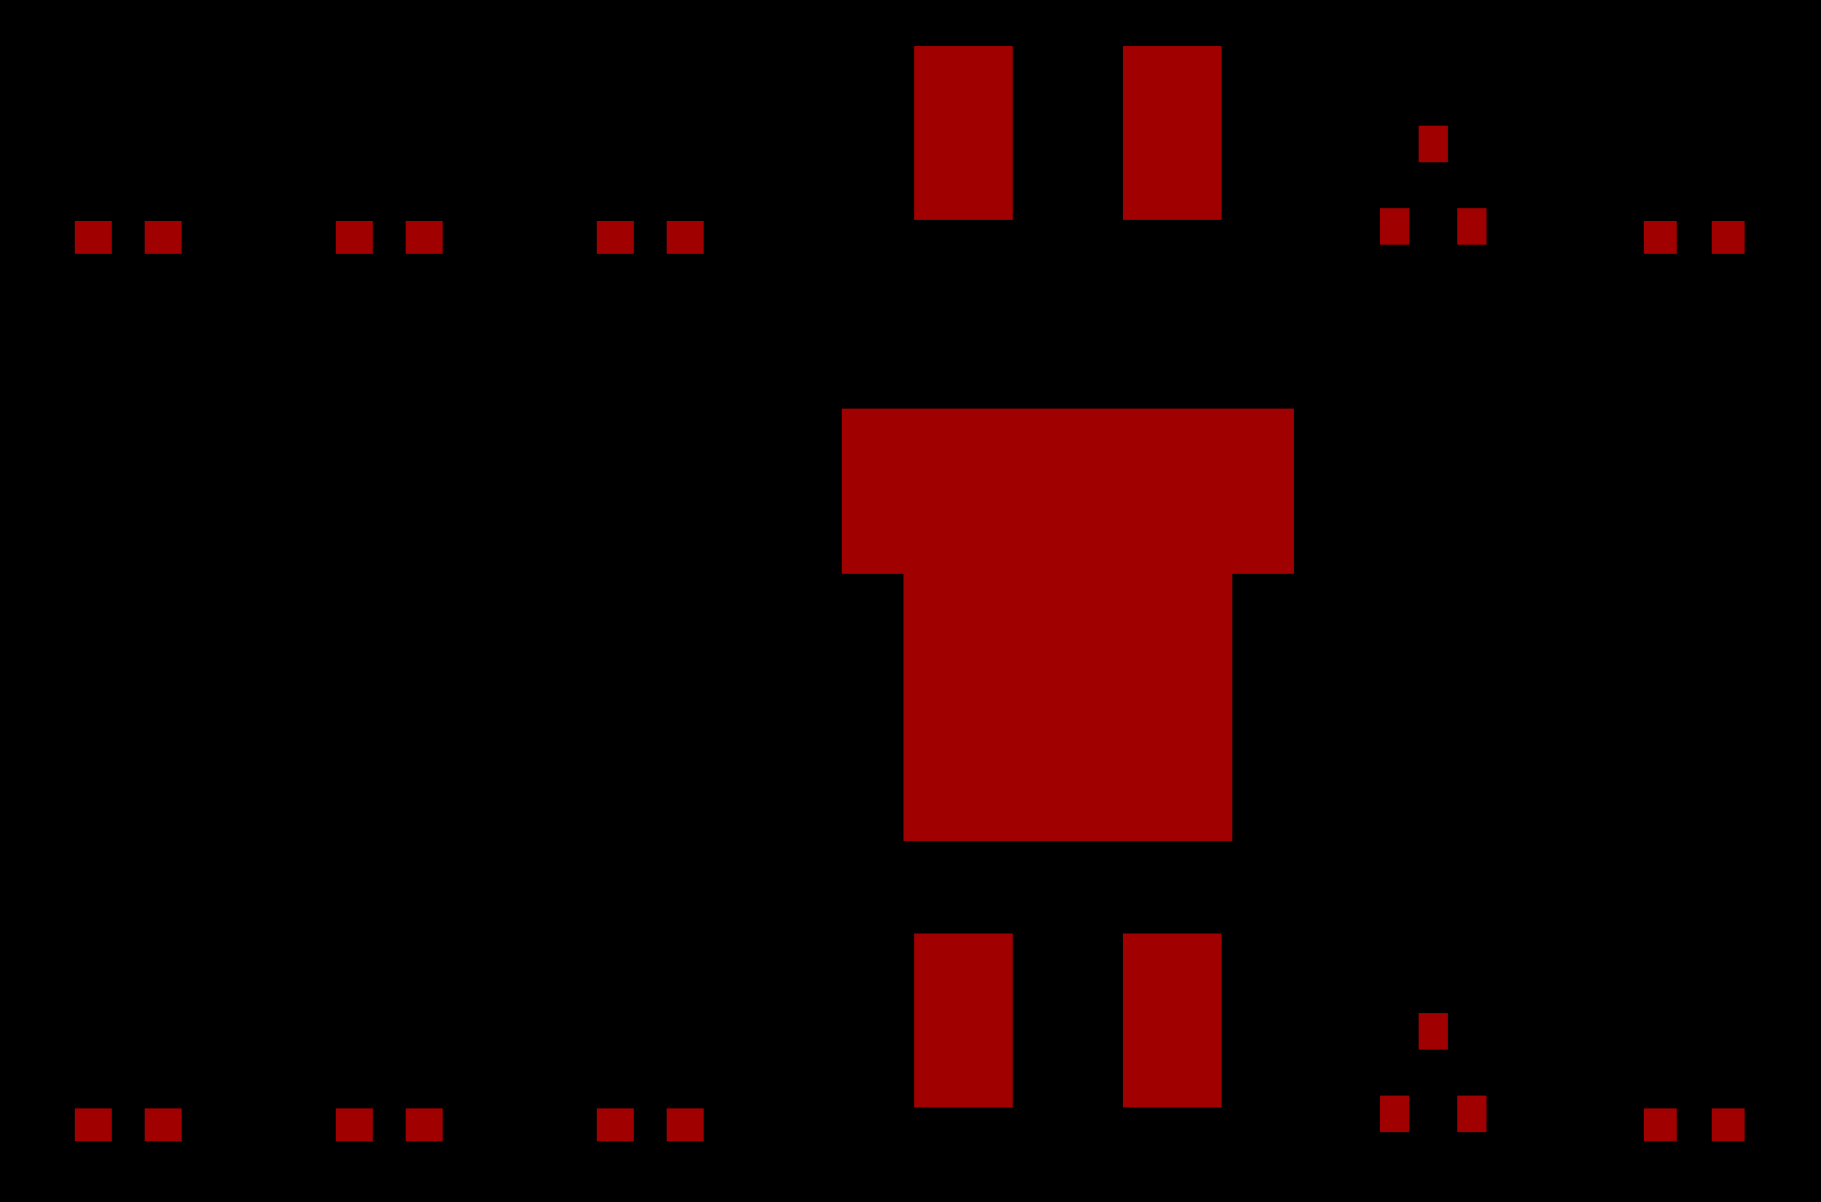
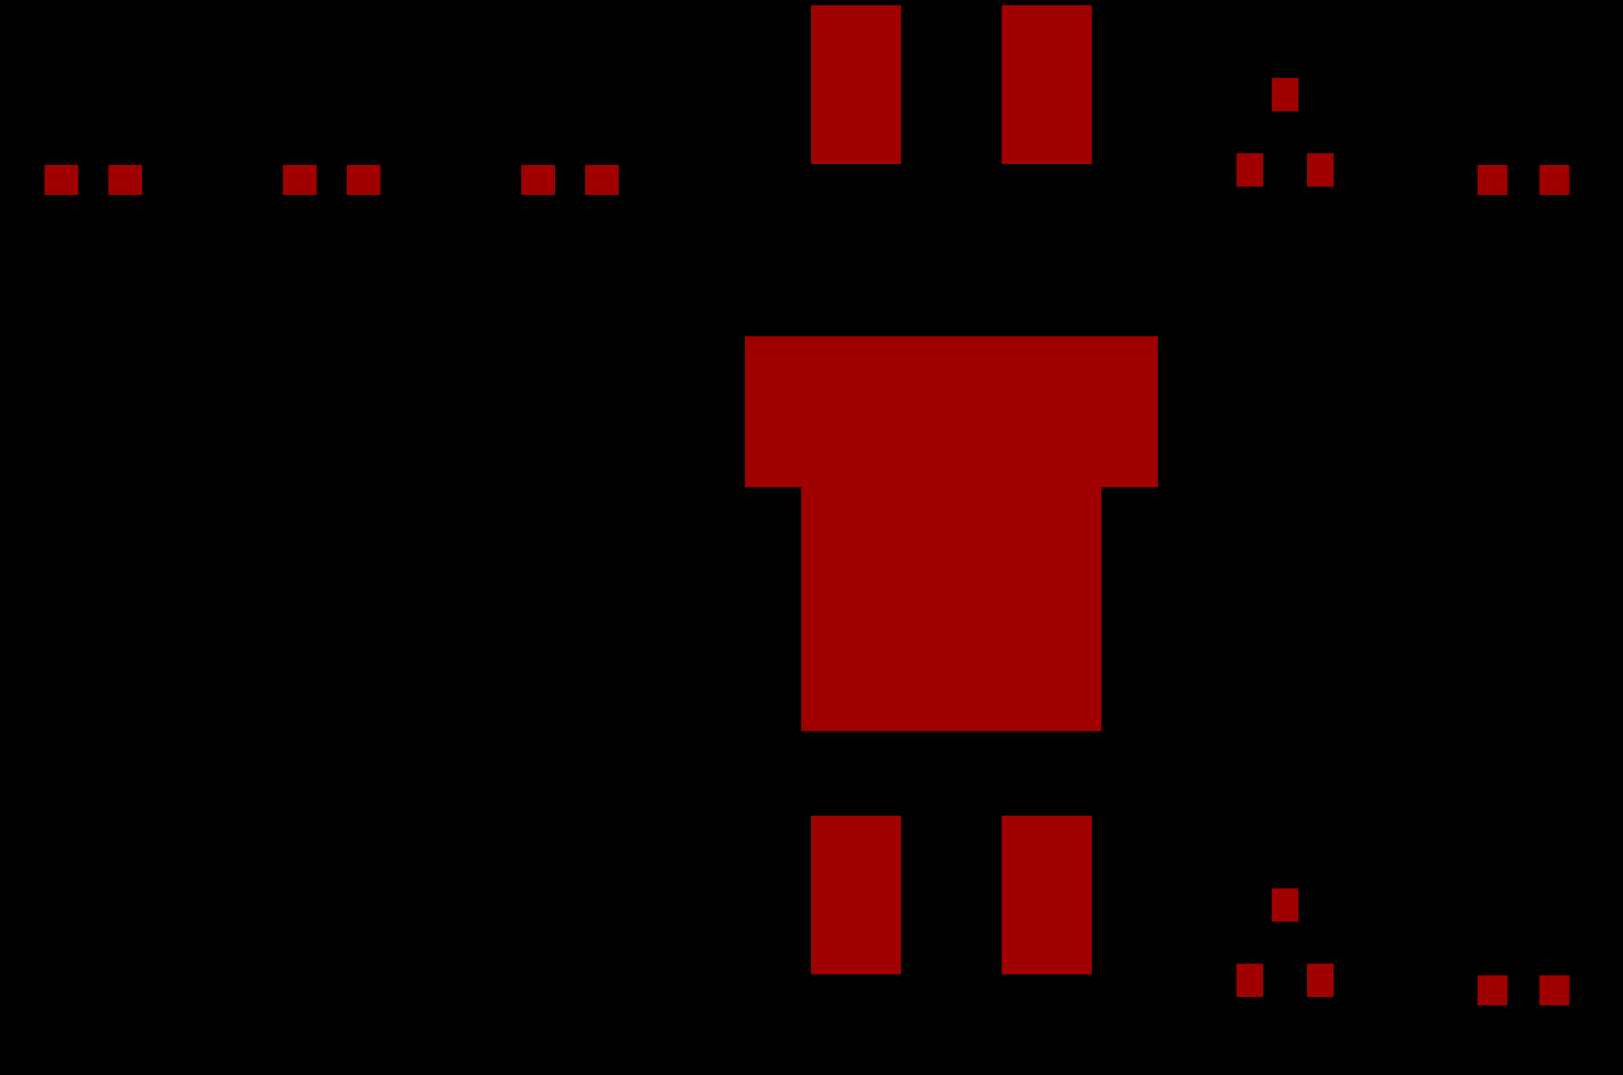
part: (128, 1124) -> none
part: (389, 1124) -> none
part: (650, 1124) -> none

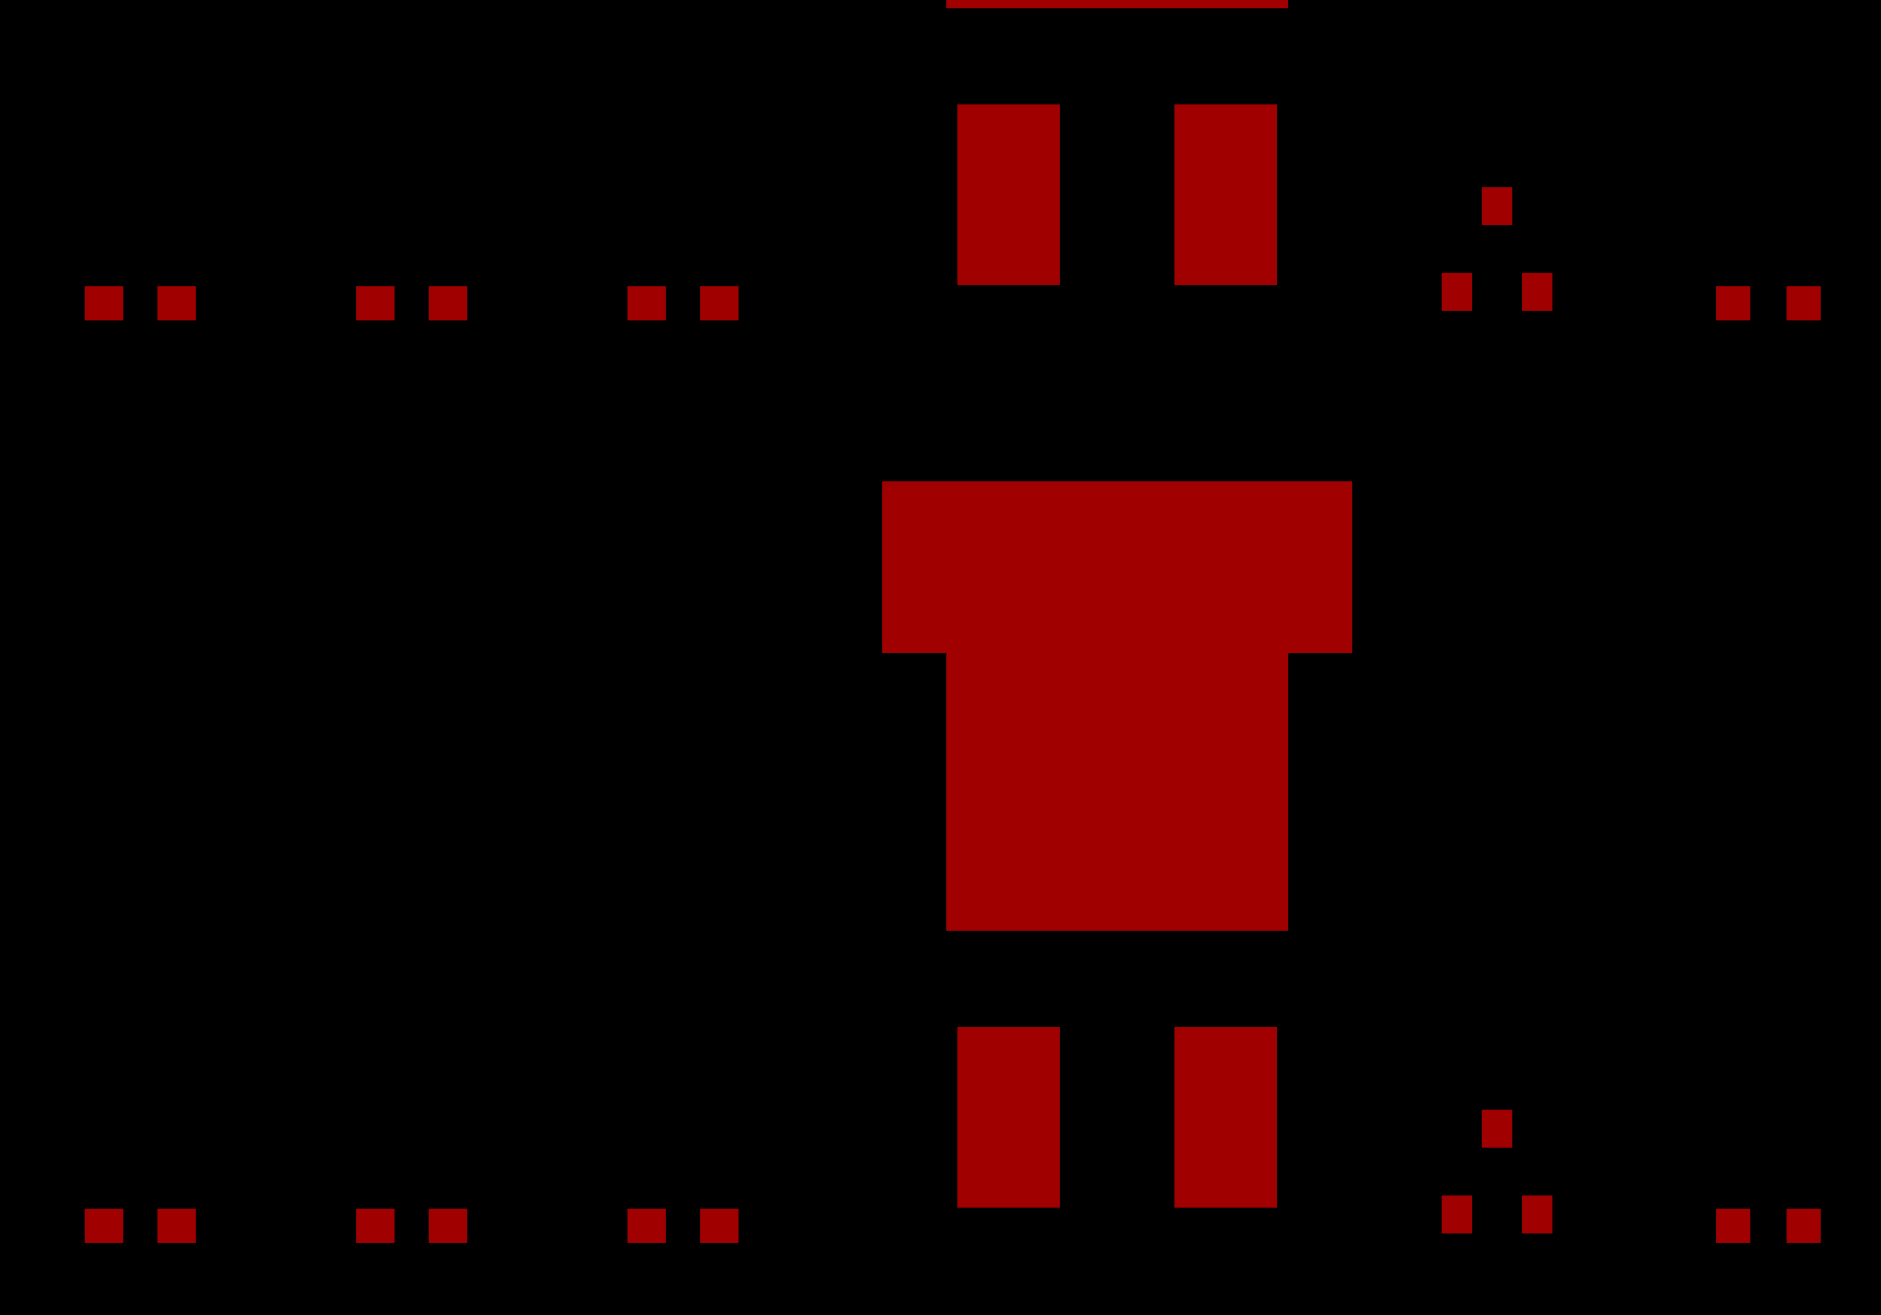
part: none -> (140, 1225)
part: none -> (411, 1225)
part: none -> (683, 1225)

